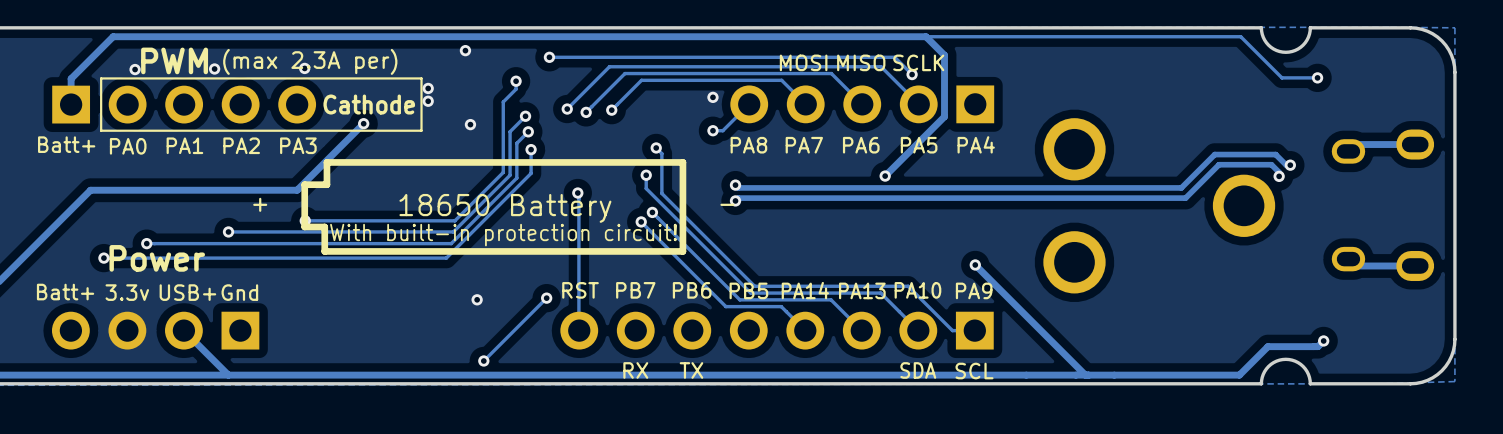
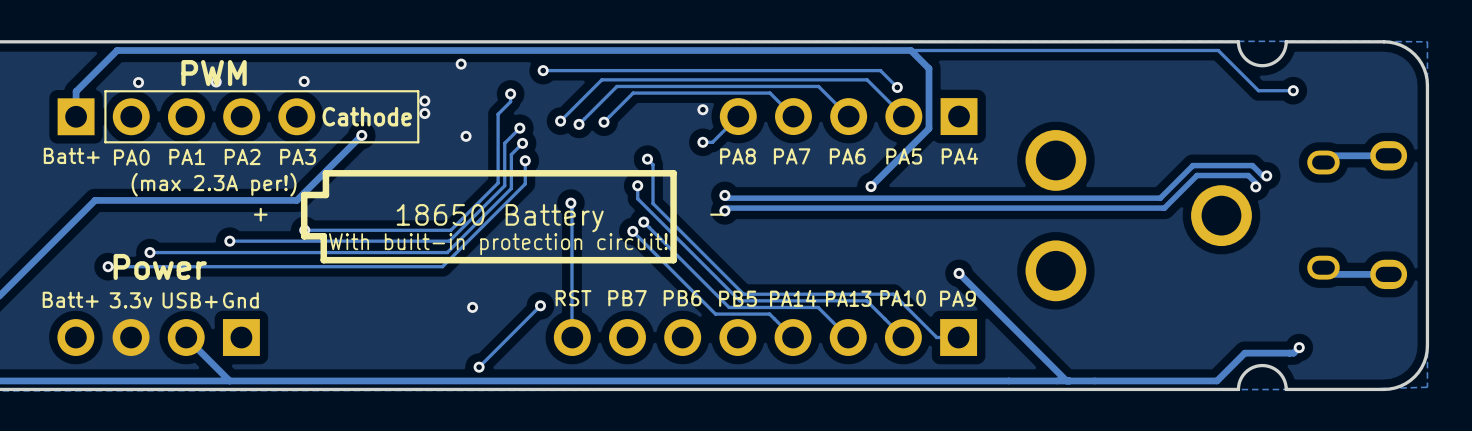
text position: PWM (174, 60) -> PWM (214, 73)
text: (max 2.3A per) (310, 61) -> none
text: MOSI (803, 62) -> none
text: MISO (861, 62) -> none
text: SCLK (918, 62) -> none
text: none -> (max 2.3A per!) (214, 184)
text: RX (635, 370) -> none
text: TX (691, 370) -> none
text: SDA (918, 370) -> none
text: SCL (974, 371) -> none

